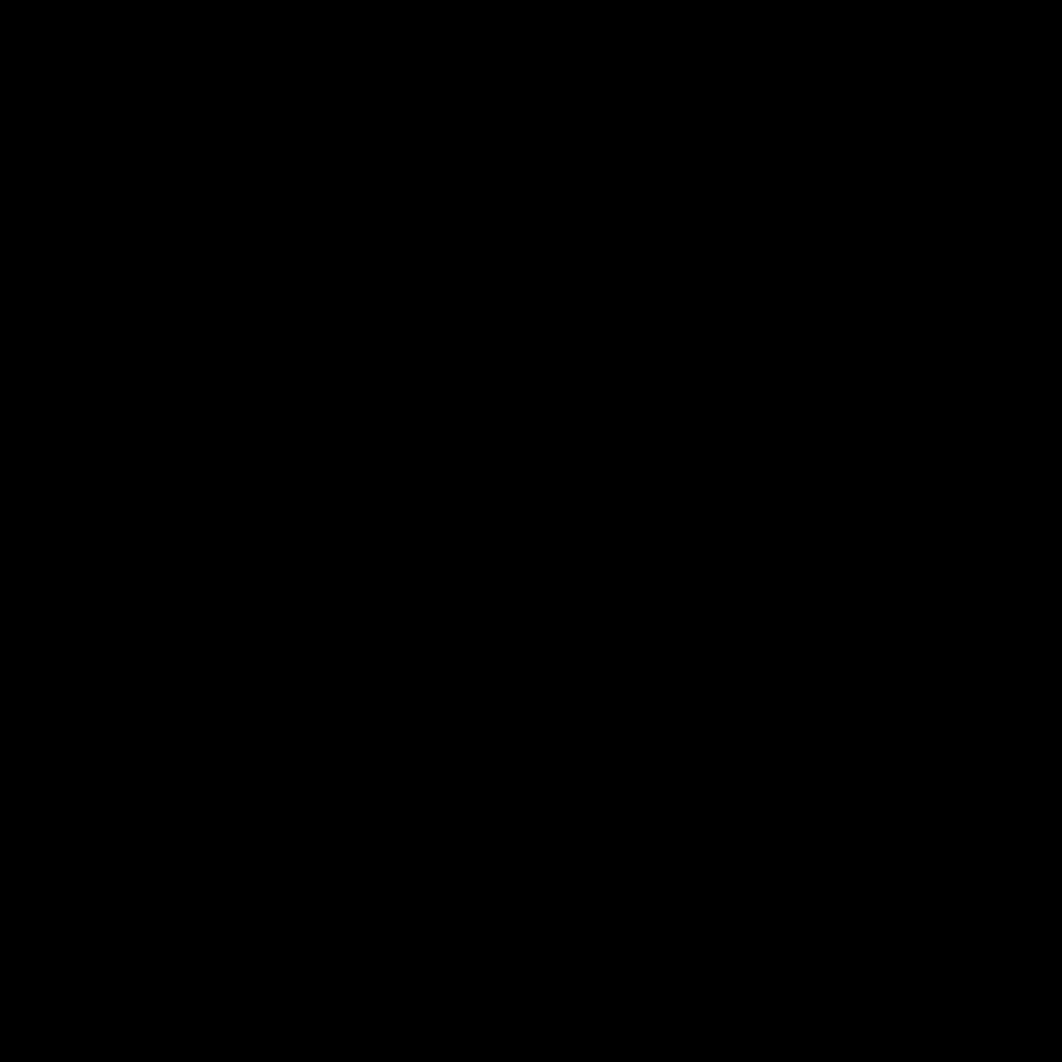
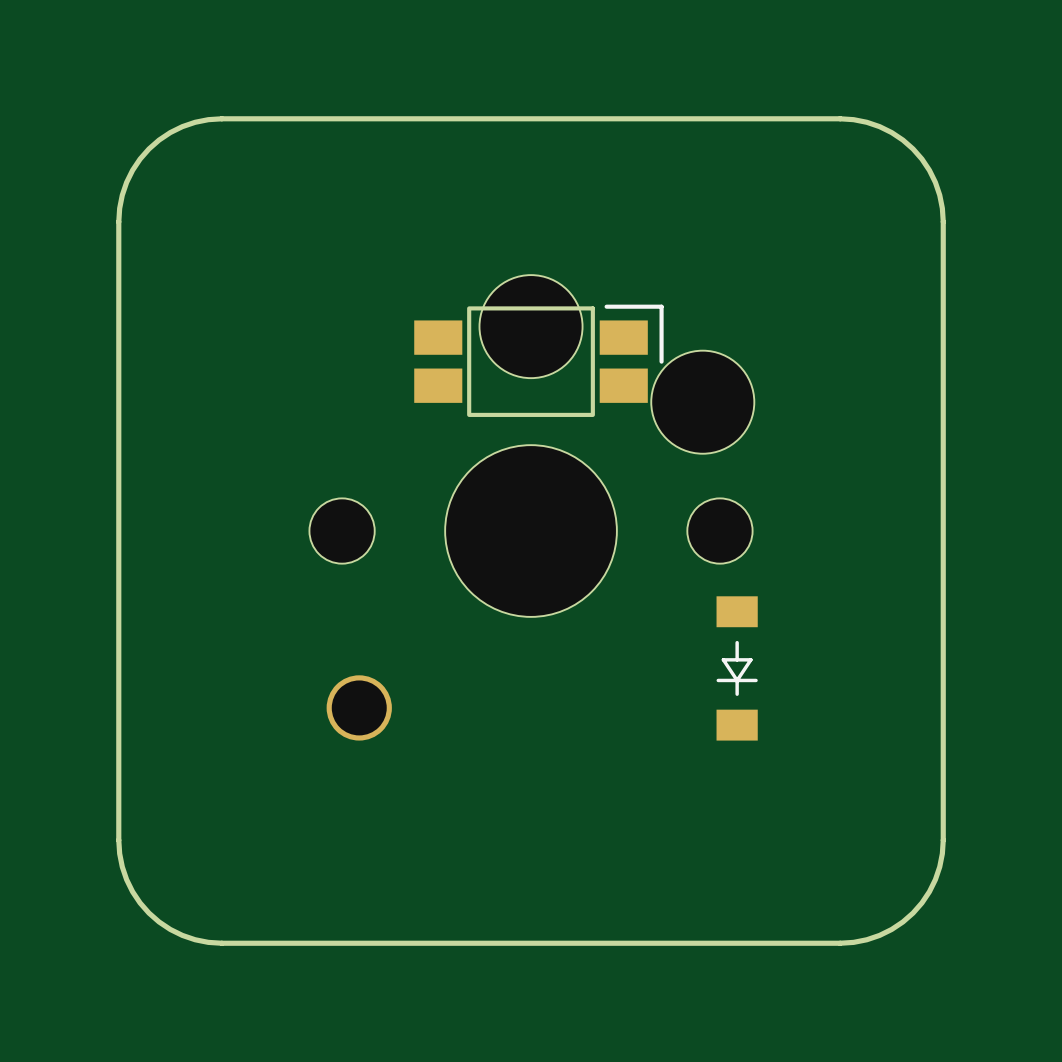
board edge: none -> (840, 118) (221, 118) (195, 122) (170, 132) (148, 148) (140, 159) (132, 170) (122, 195) (118, 221) (118, 840) (119, 853) (126, 879) (140, 902) (159, 921) (182, 935) (195, 939) (221, 943) (840, 943) (853, 942) (879, 935) (902, 921) (921, 902) (929, 891) (939, 866) (943, 840) (942, 208) (935, 182) (921, 159) (913, 148) (891, 132) (879, 126) (866, 122) (840, 118)
part: none -> (538, 360)
part: none -> (531, 507)
part: none -> (737, 668)

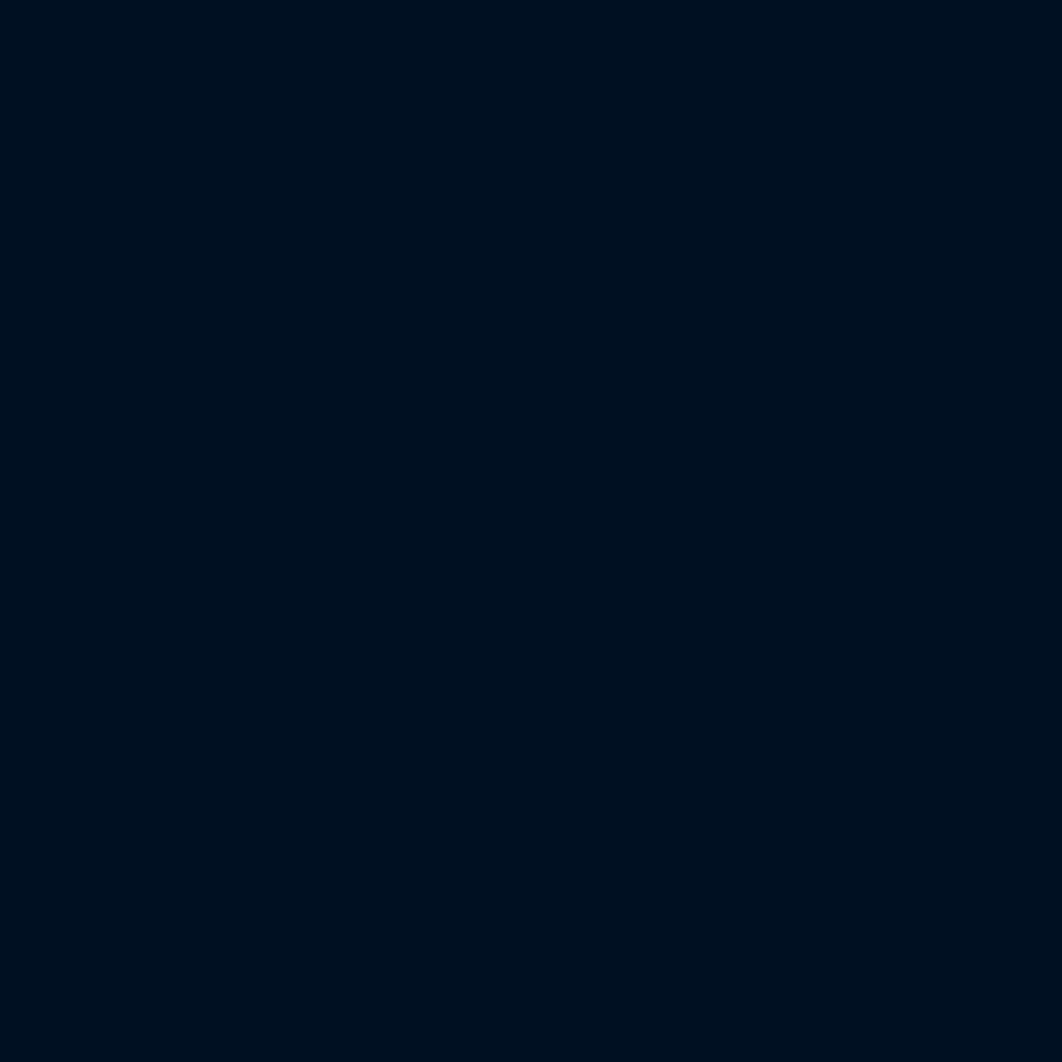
board edge: (840, 118) (221, 118) (195, 122) (170, 132) (148, 148) (140, 159) (132, 170) (122, 195) (118, 221) (118, 840) (119, 853) (126, 879) (140, 902) (159, 921) (182, 935) (195, 939) (221, 943) (840, 943) (853, 942) (879, 935) (902, 921) (921, 902) (929, 891) (939, 866) (943, 840) (942, 208) (935, 182) (921, 159) (913, 148) (891, 132) (879, 126) (866, 122) (840, 118) -> none
part: (538, 360) -> none
part: (531, 507) -> none
part: (737, 668) -> none

